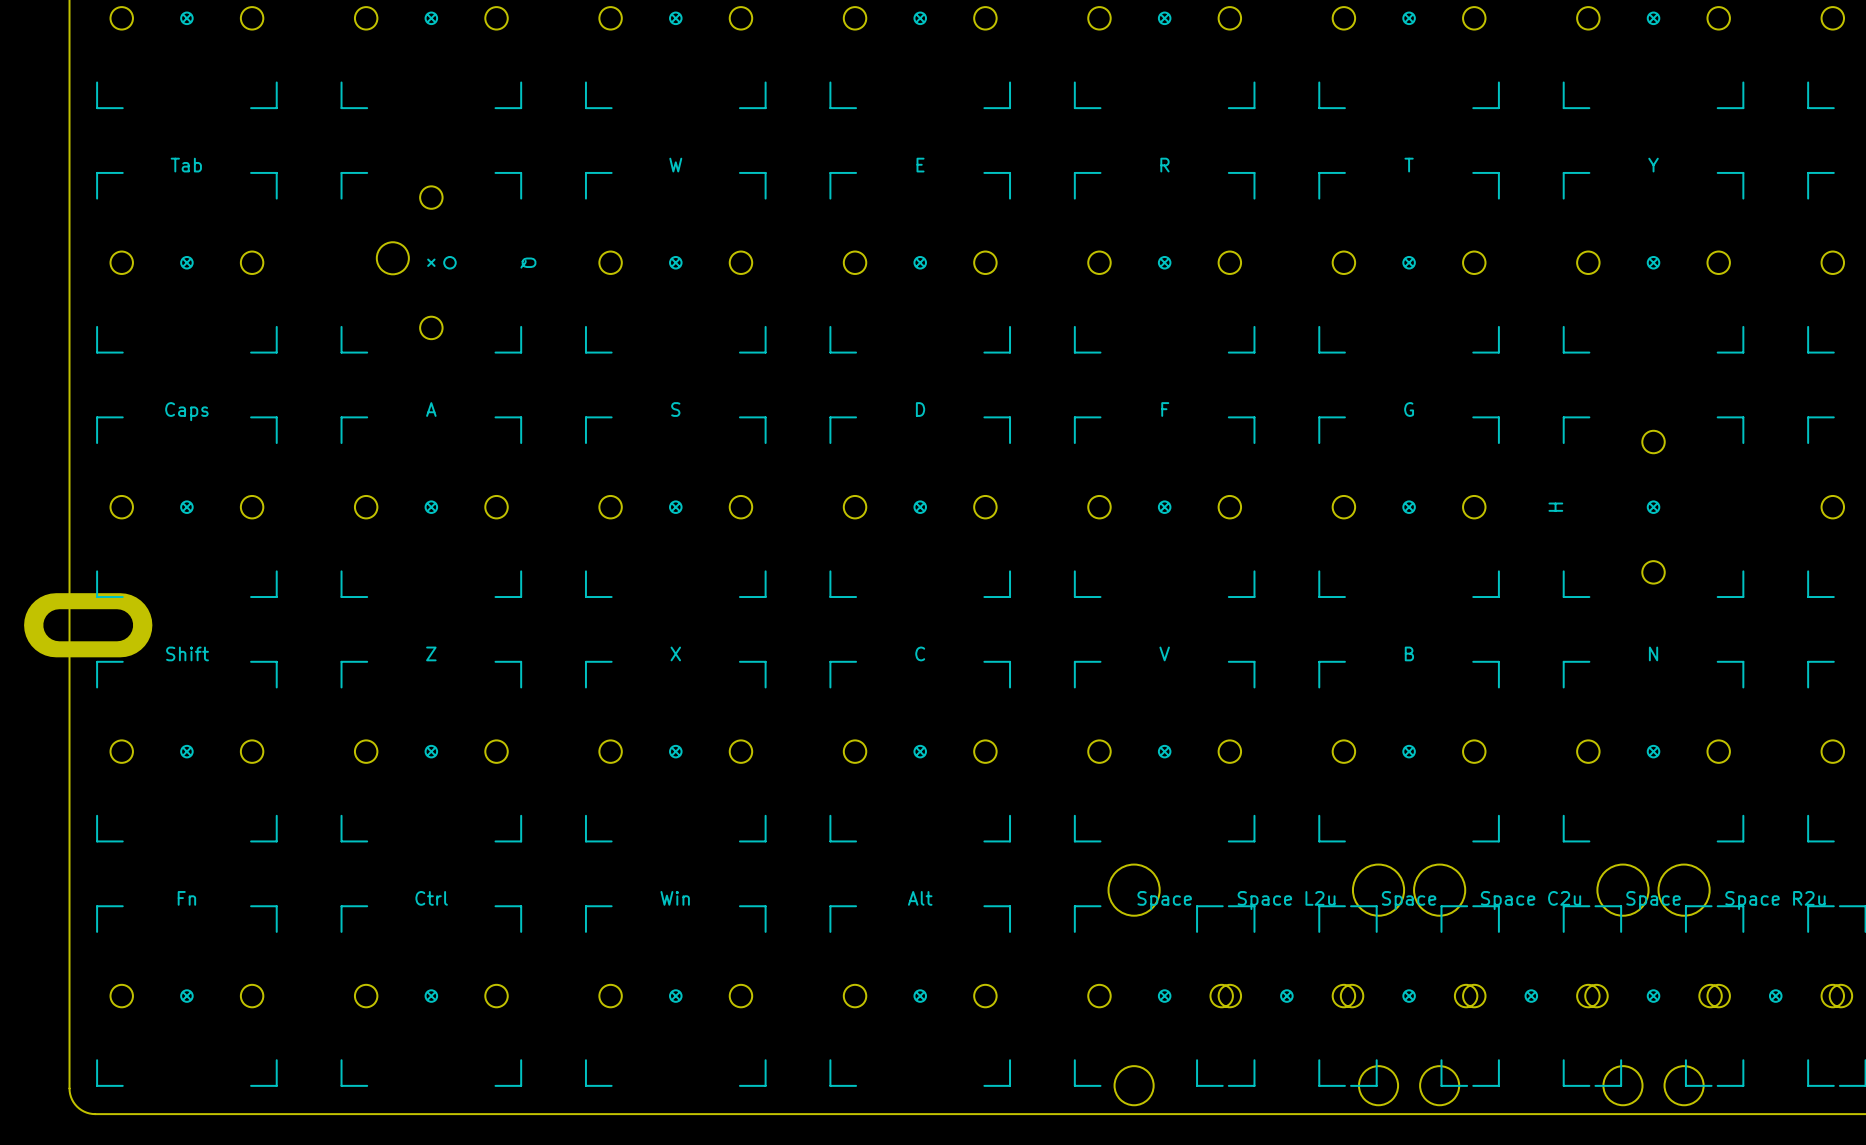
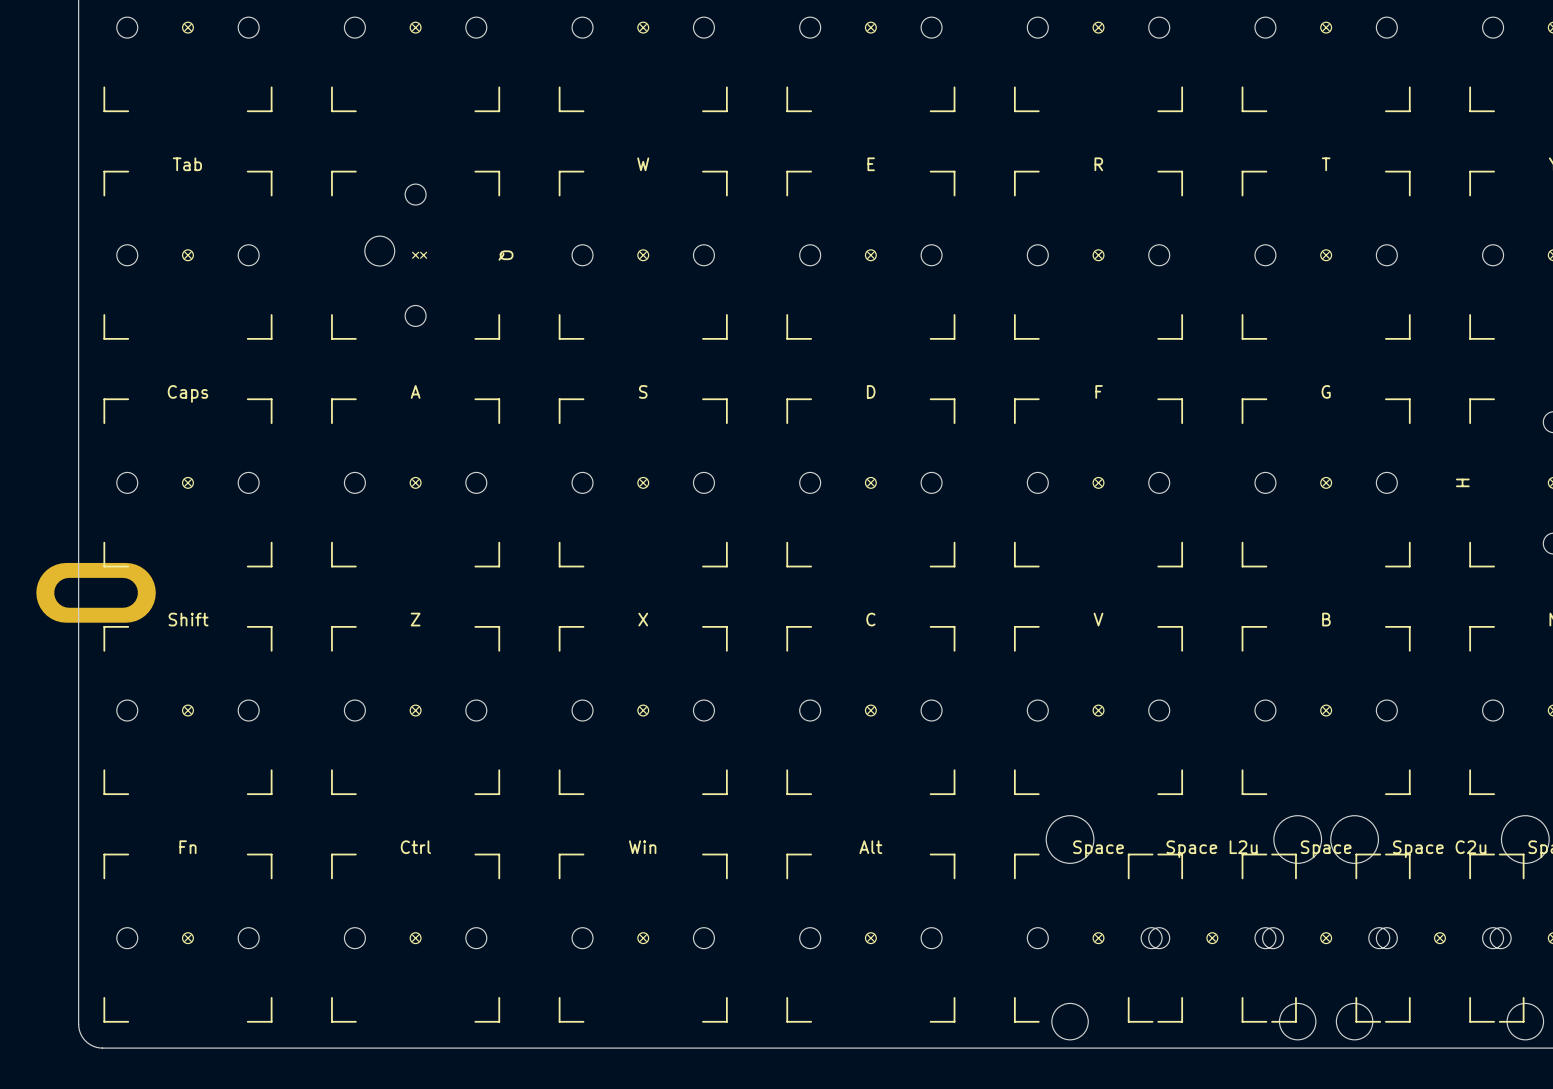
part footprint: [443, 256, 457, 270] -> [420, 251, 428, 259]

